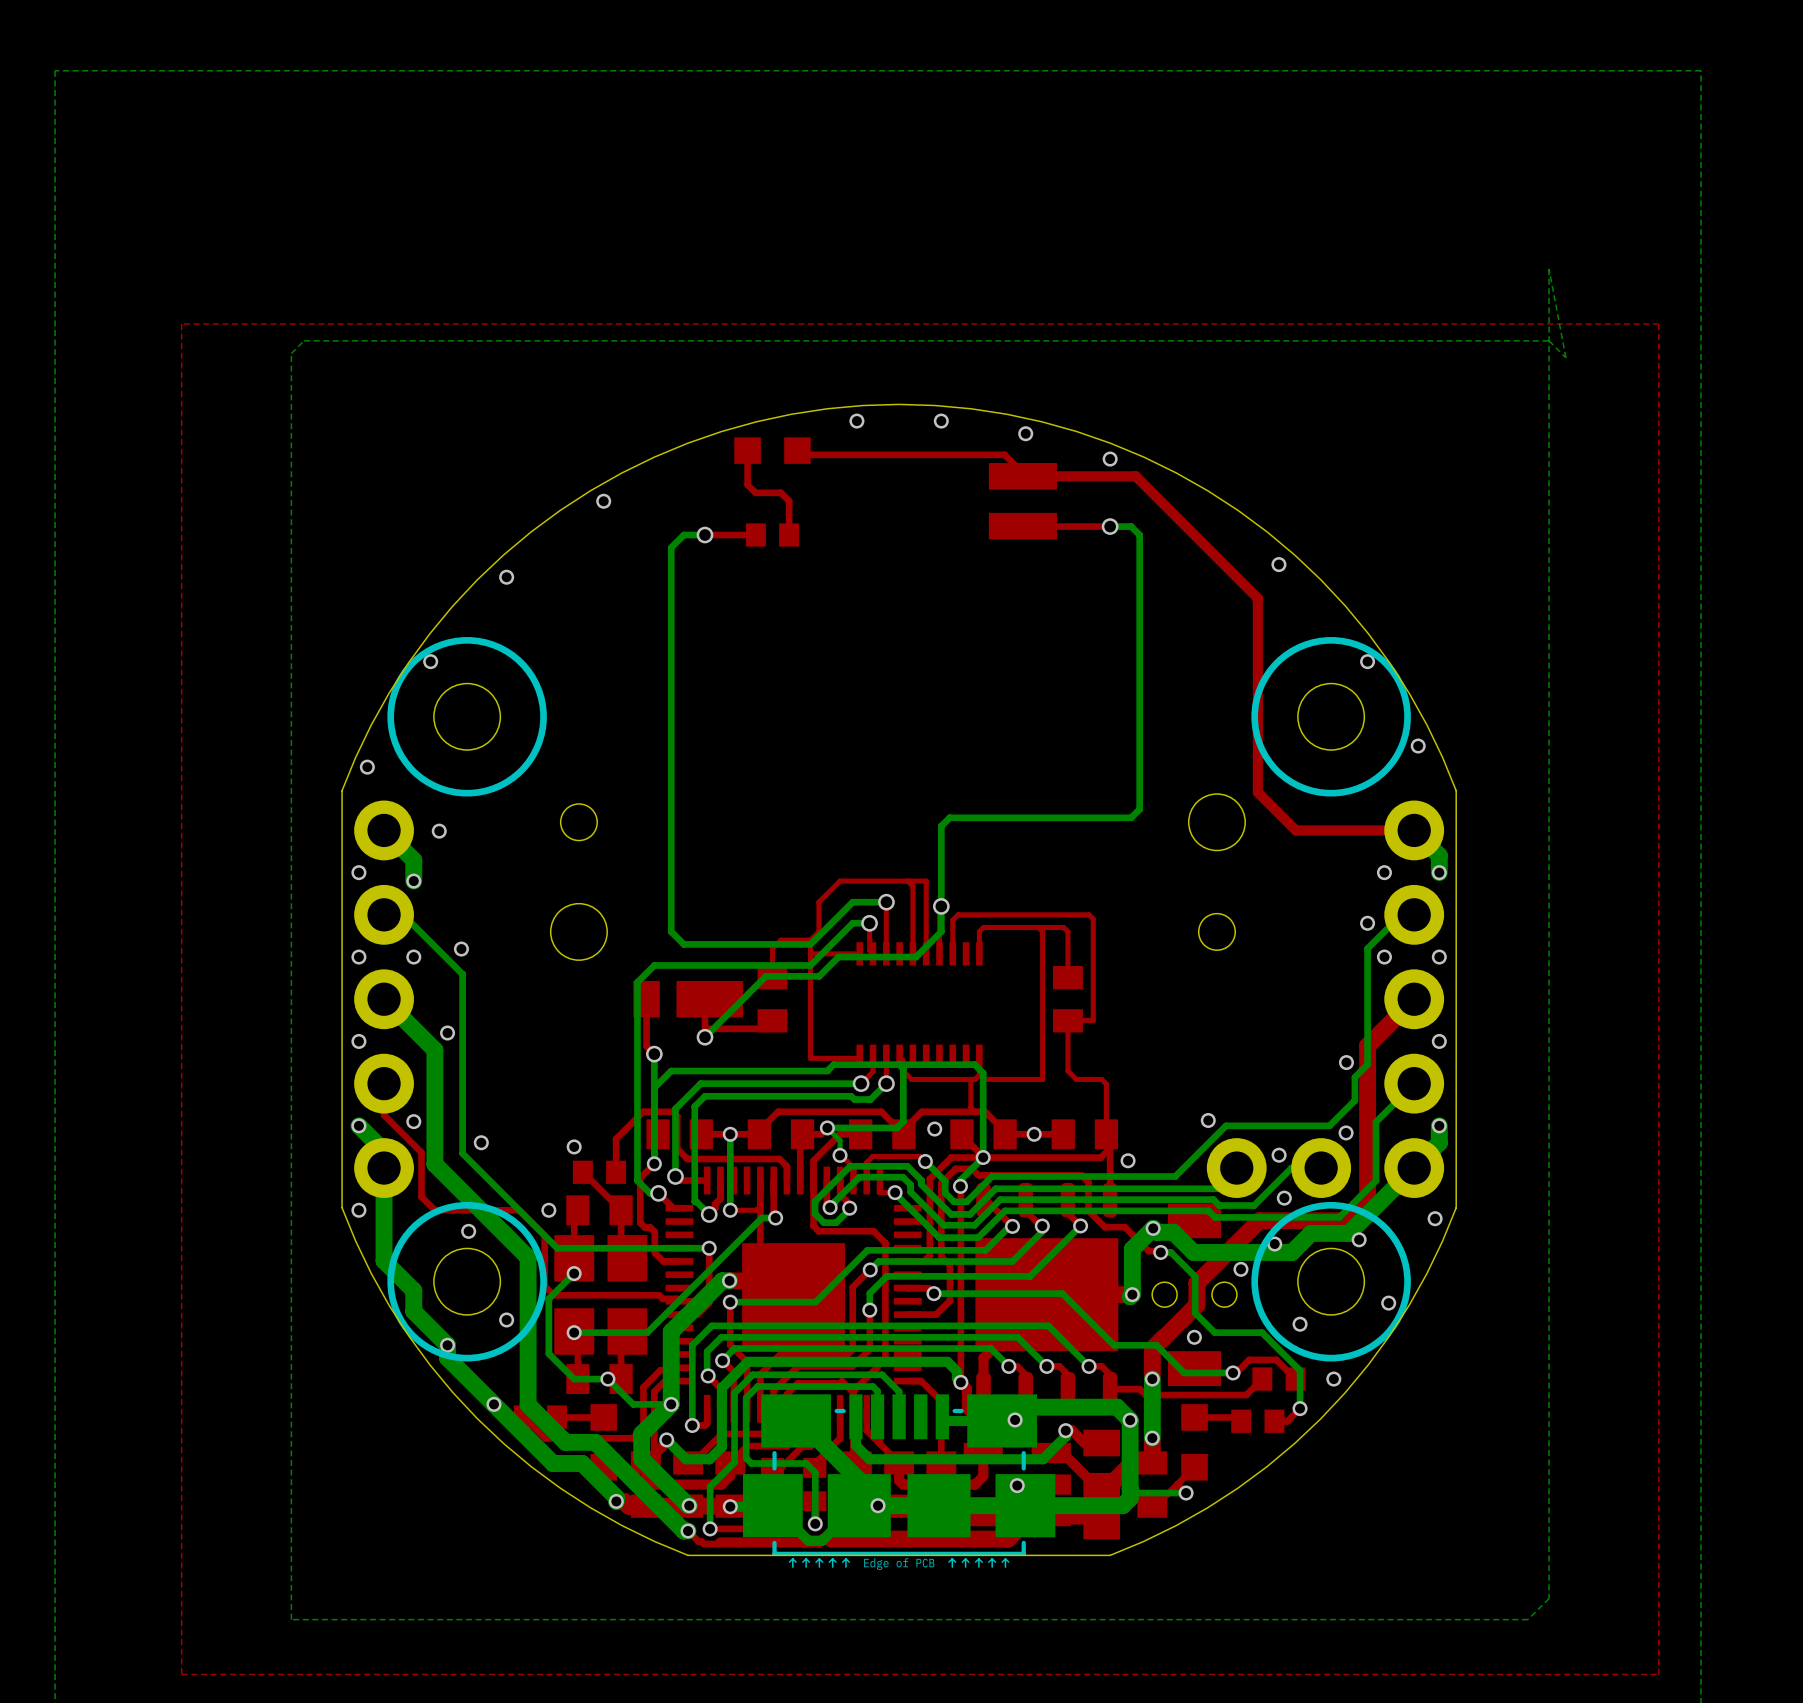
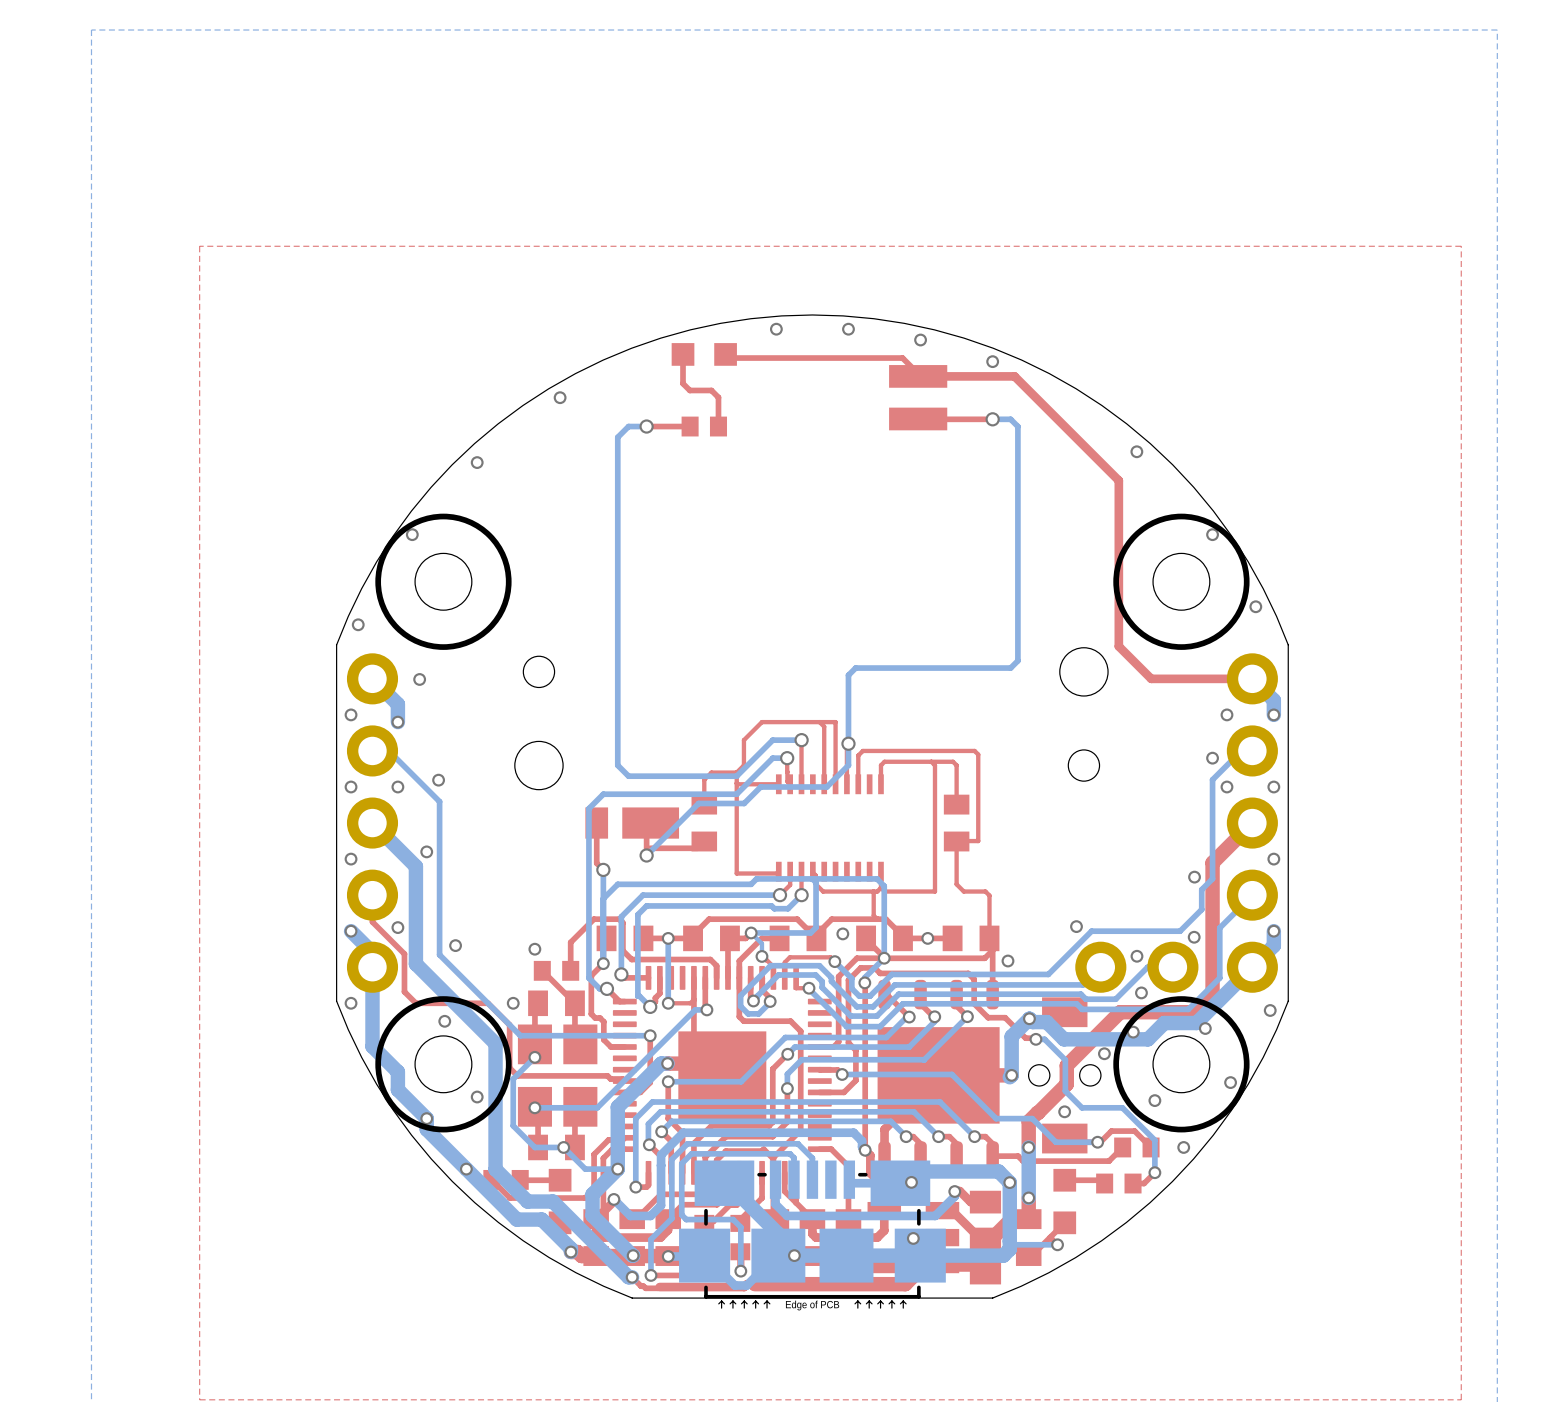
bottom zone outline: (1549, 269) (1549, 1598) (1527, 1619) (291, 1619) (291, 353) (304, 340) (1549, 340) (1565, 357) (1549, 269) -> none

